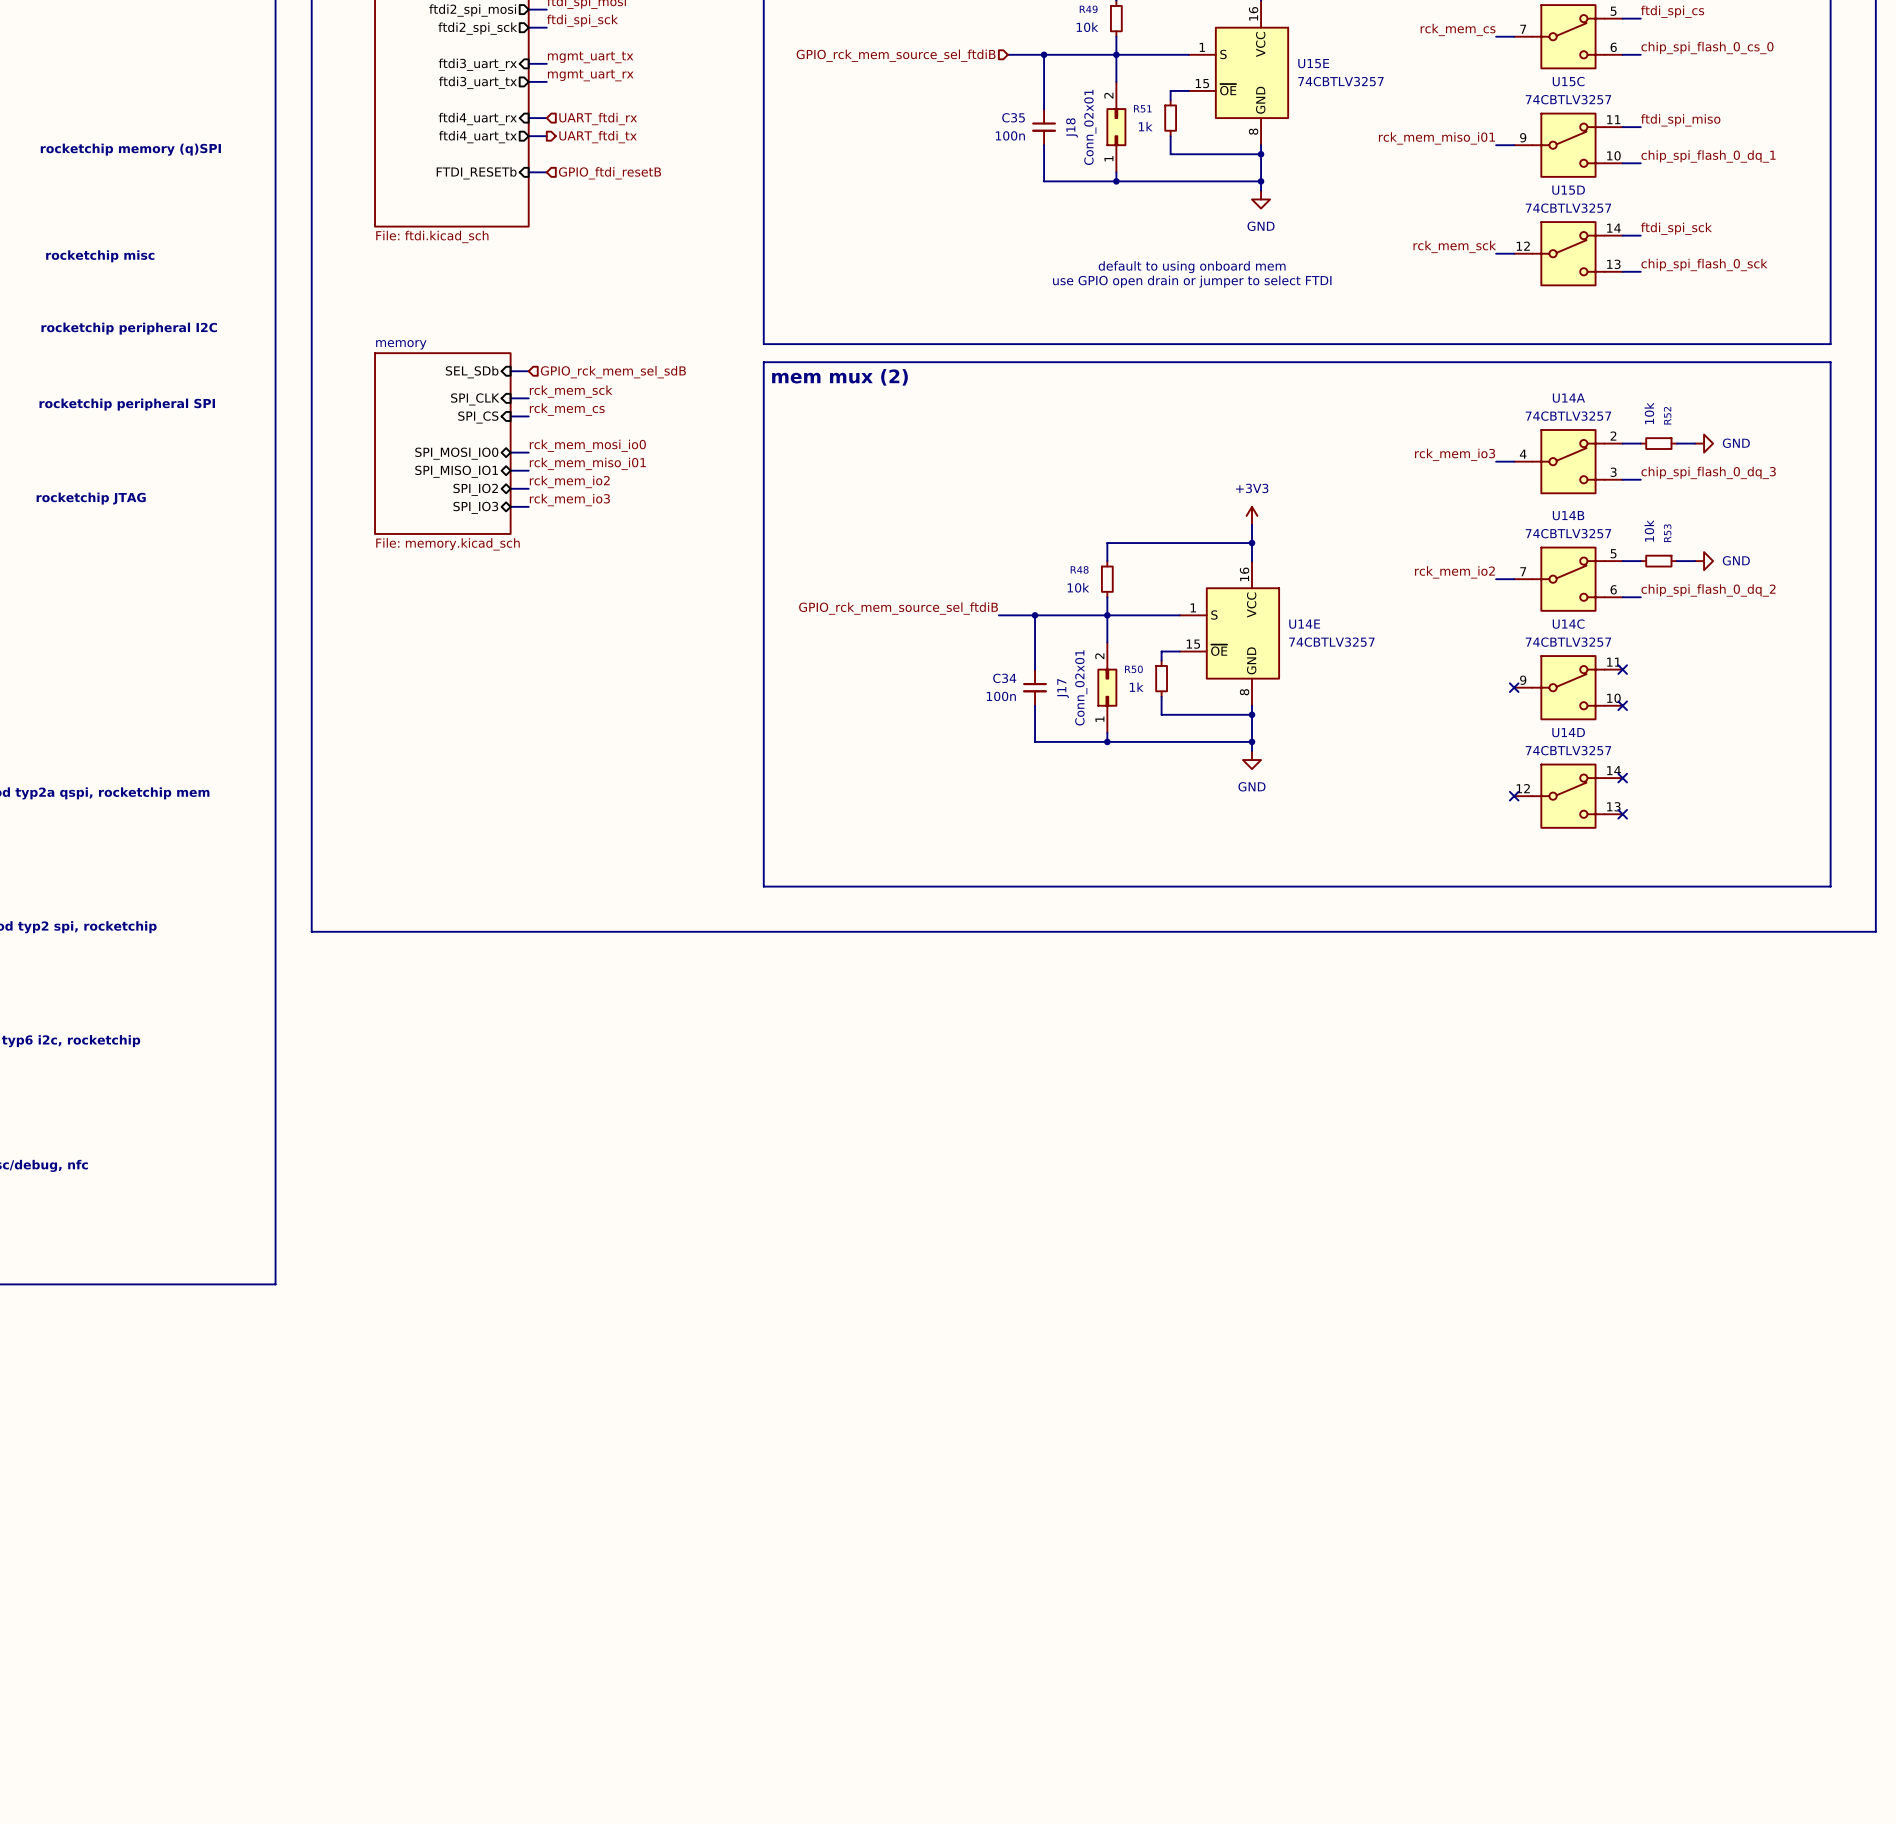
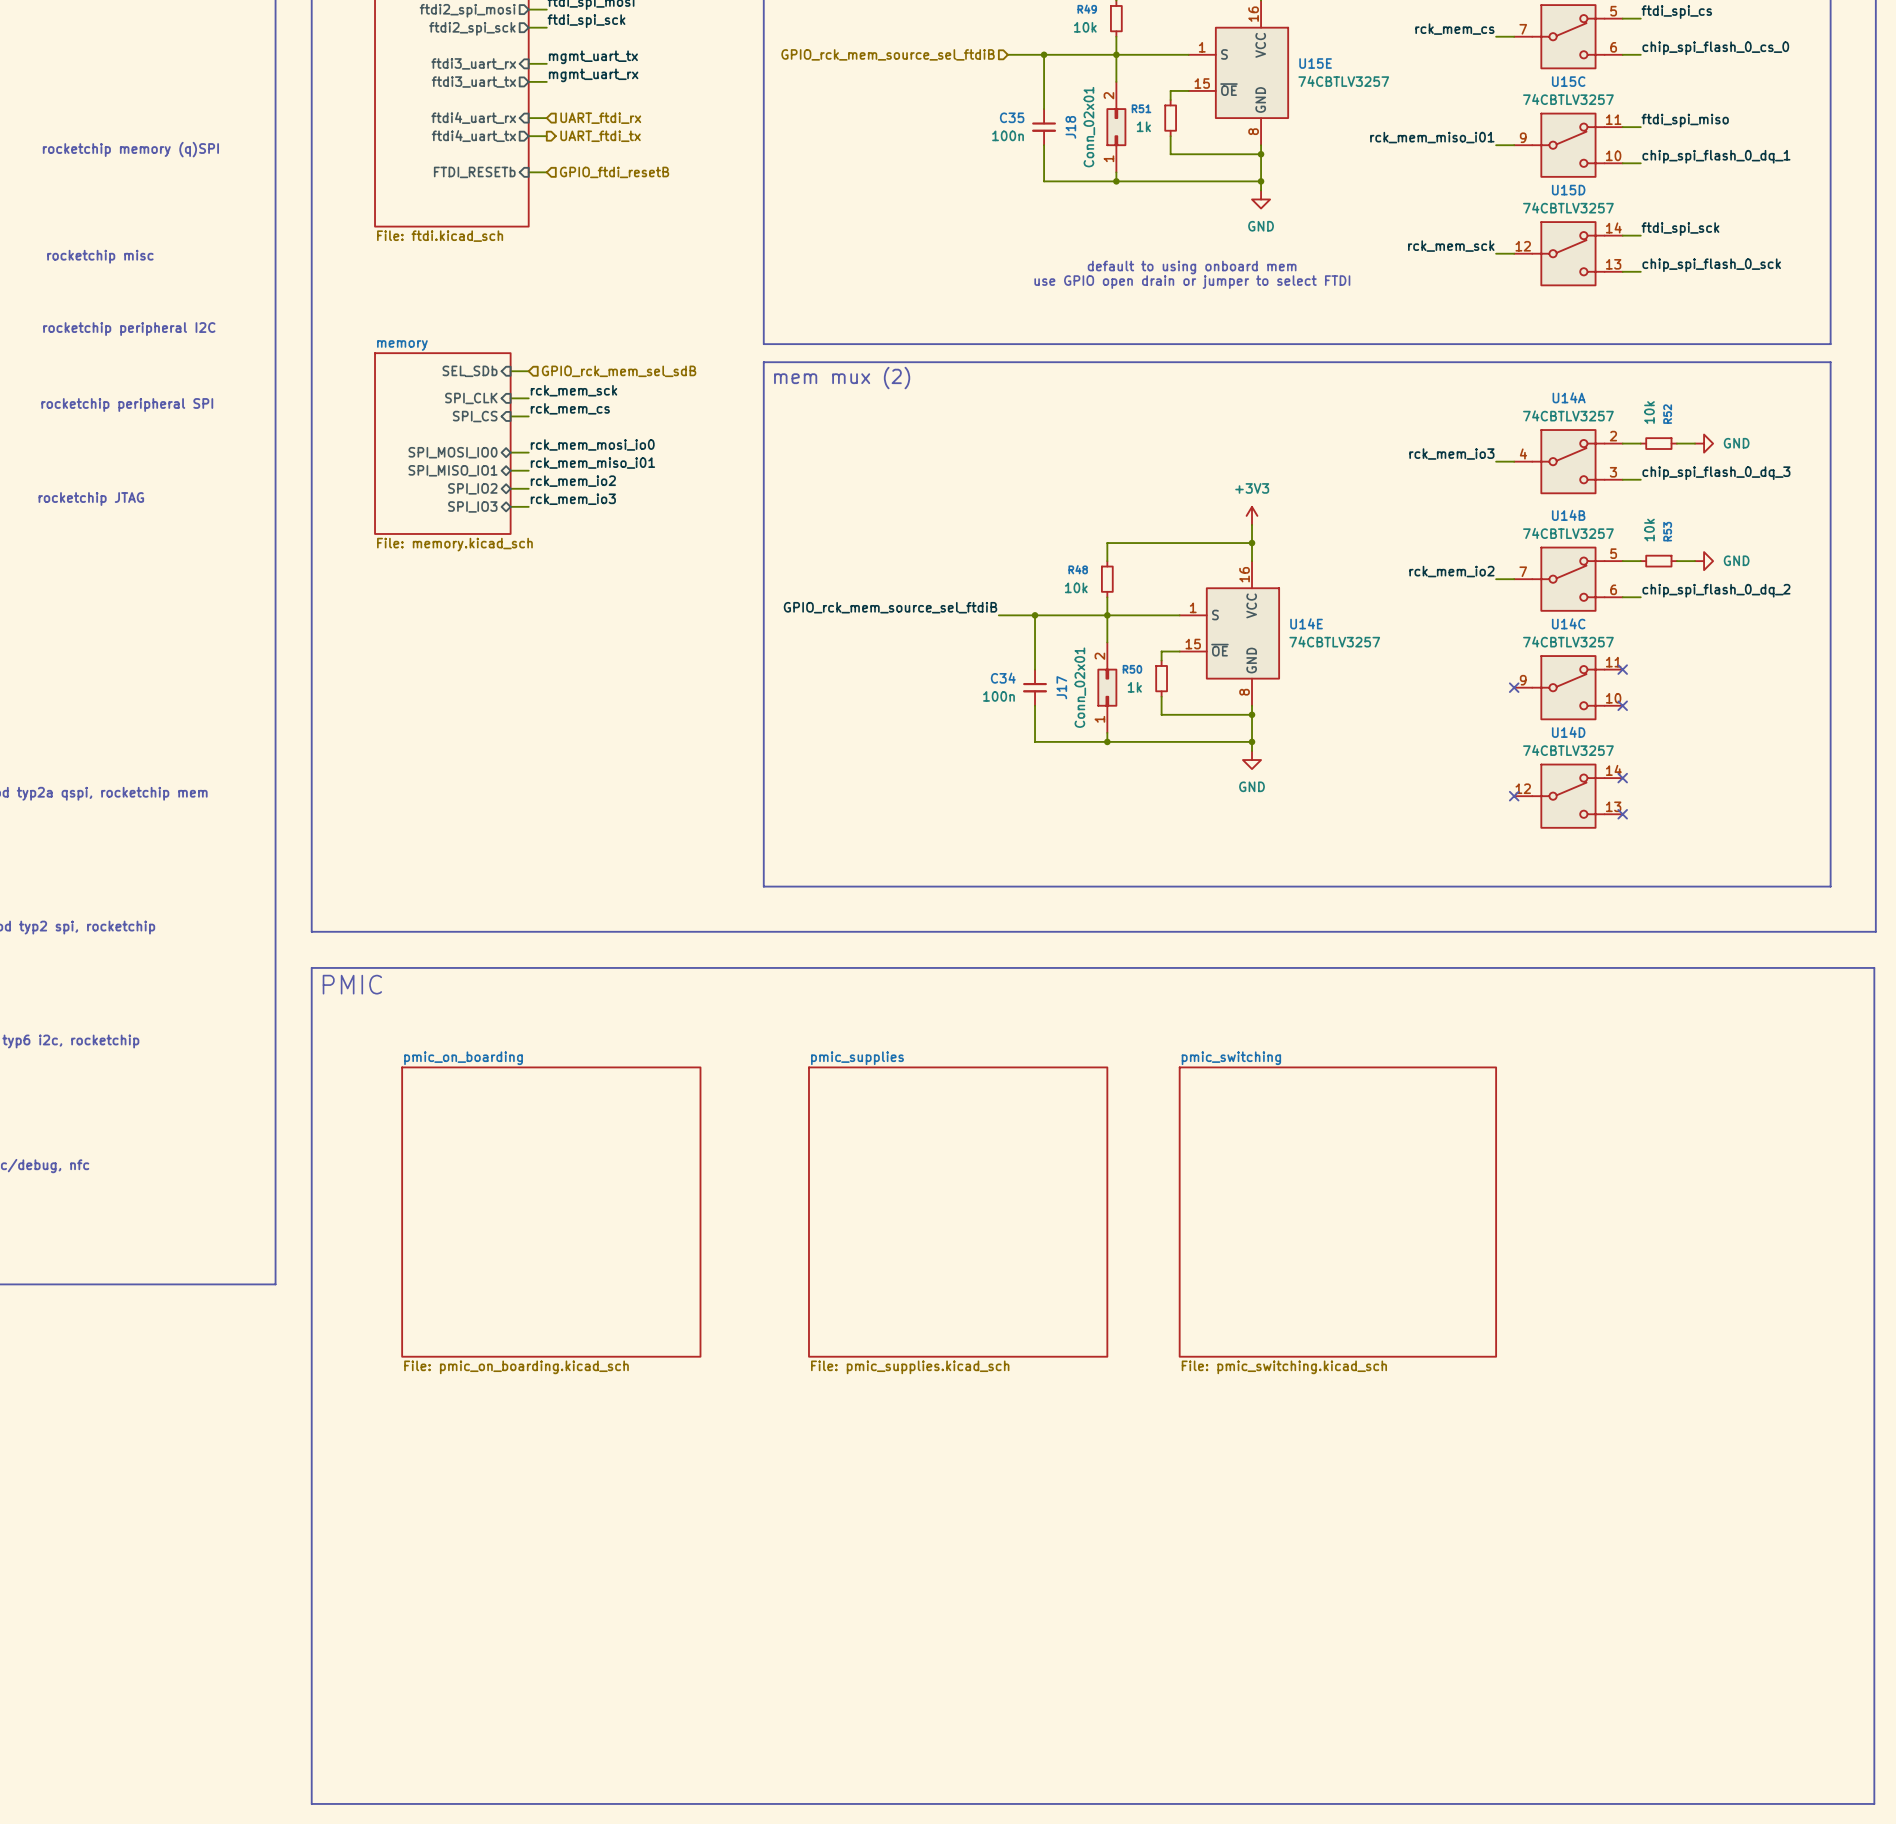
line: none -> (311, 967) (1874, 967) (1874, 1803) (311, 1803) (311, 967)
text: none -> PMIC (352, 984)
sheet pmic_on_boarding: none -> File: pmic_on_boarding.kicad_sch (551, 1212)
sheet pmic_supplies: none -> File: pmic_supplies.kicad_sch (958, 1212)
sheet pmic_switching: none -> File: pmic_switching.kicad_sch (1337, 1212)

